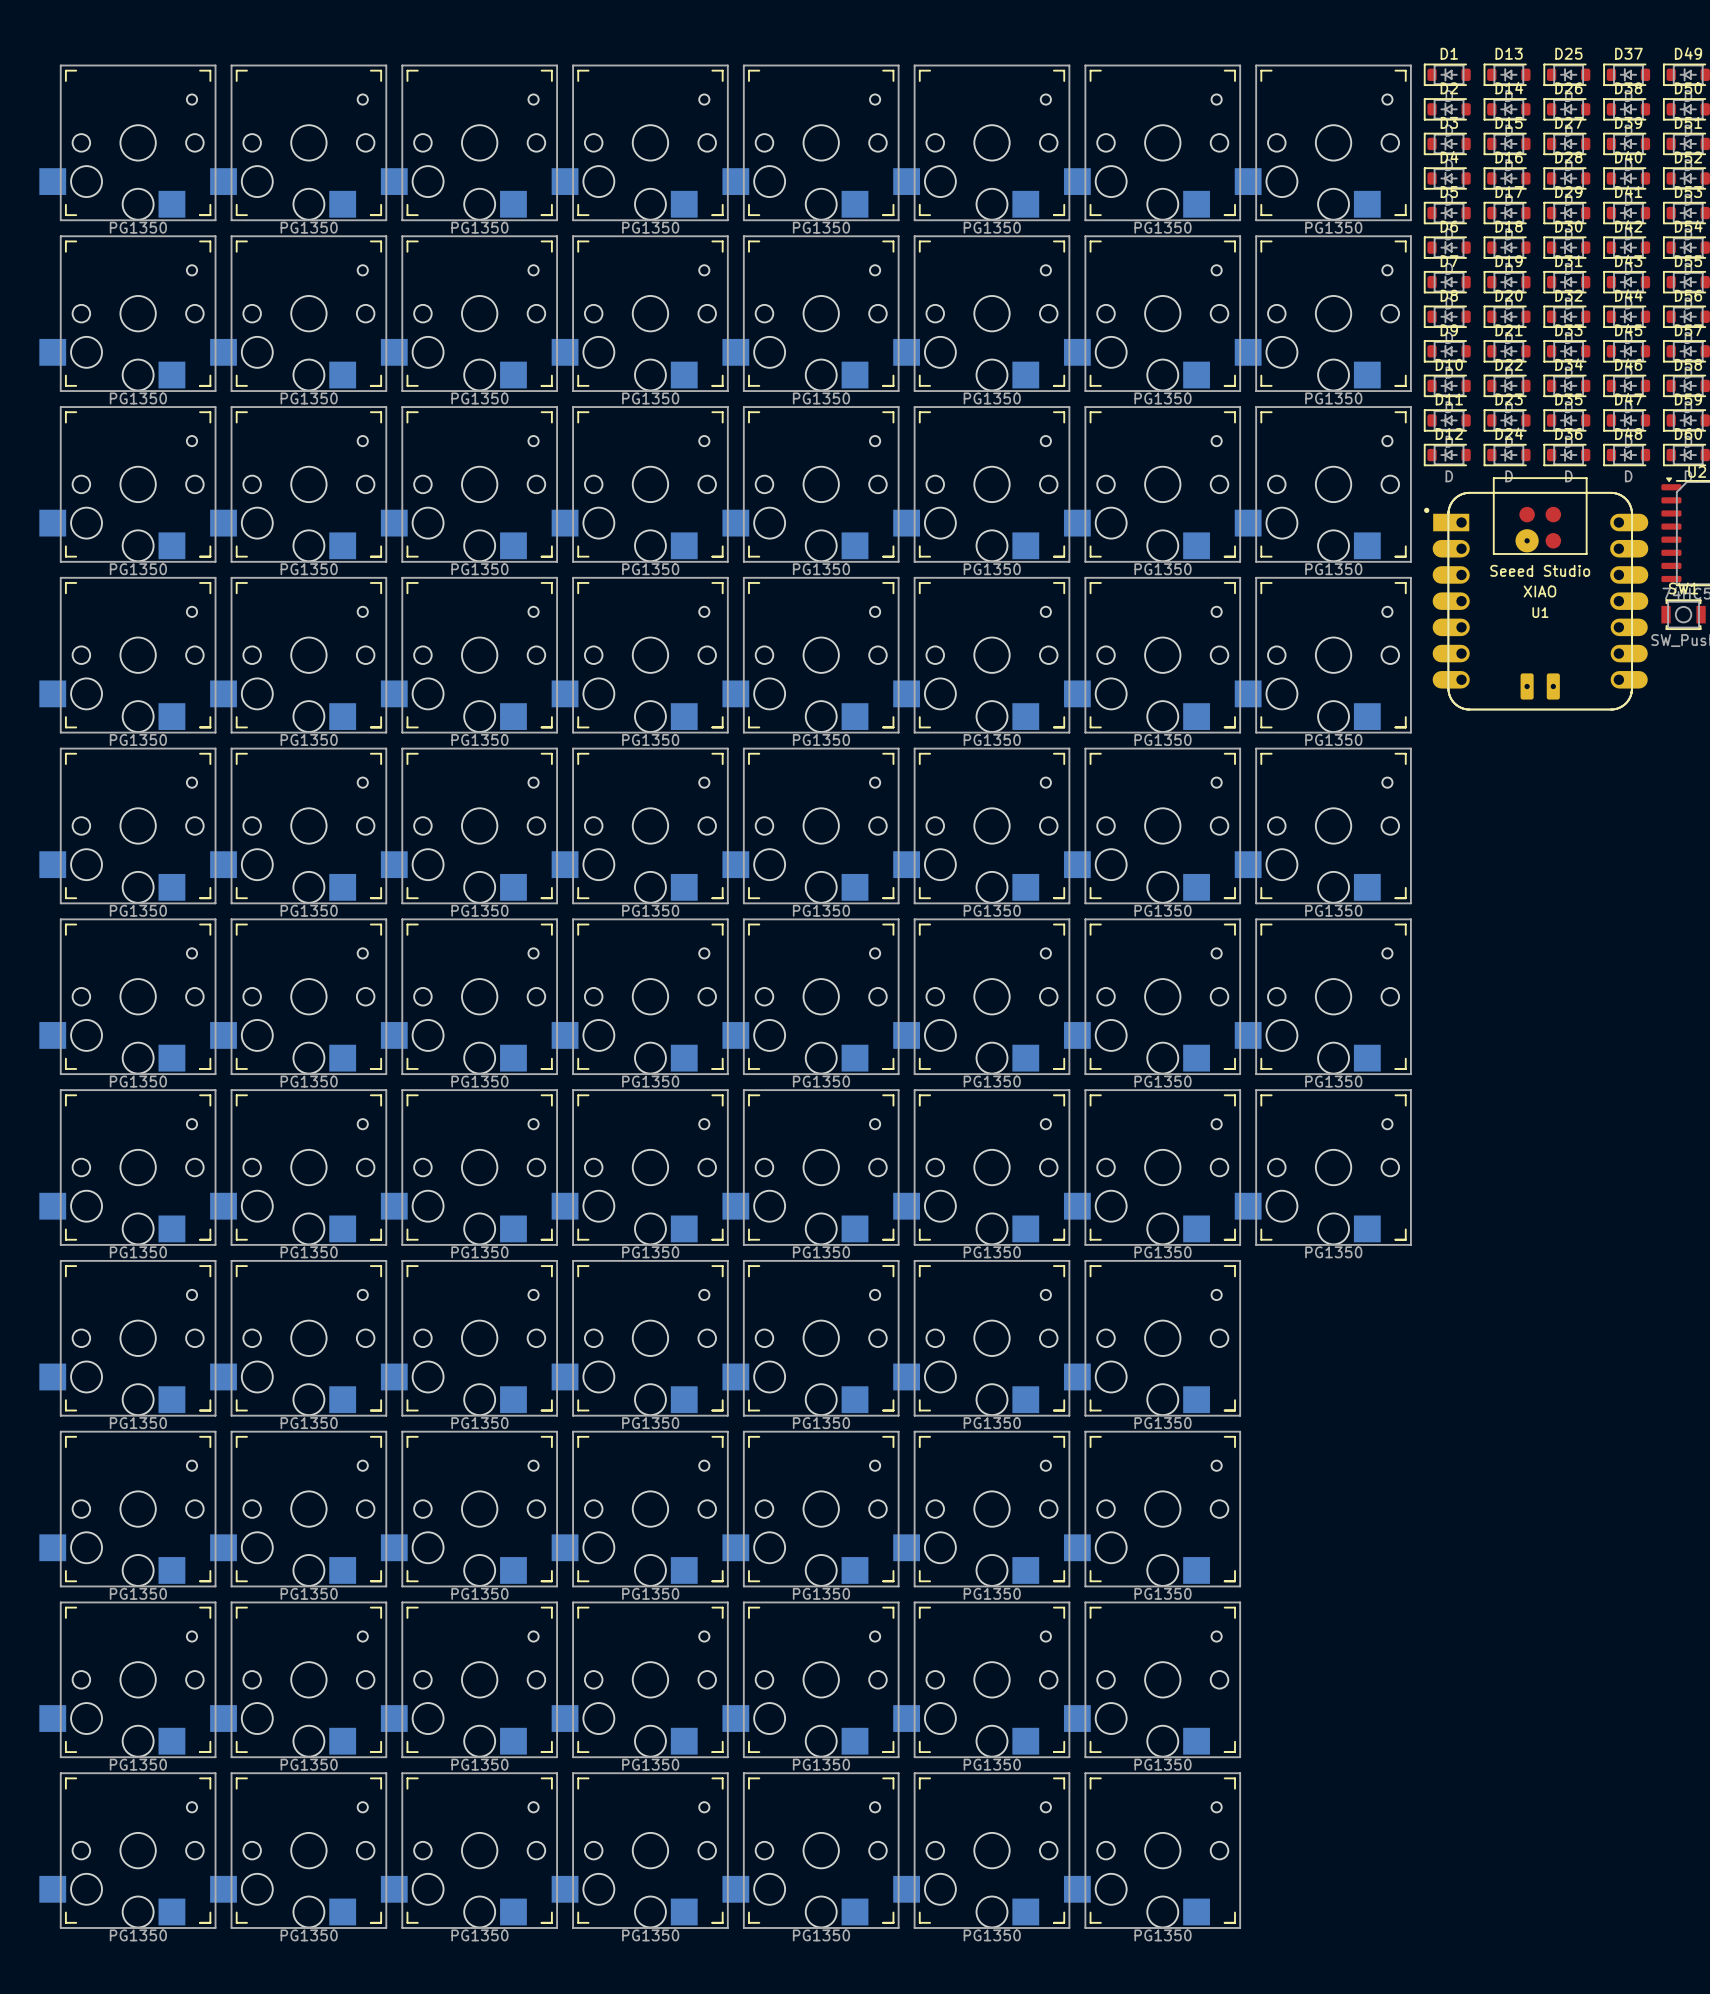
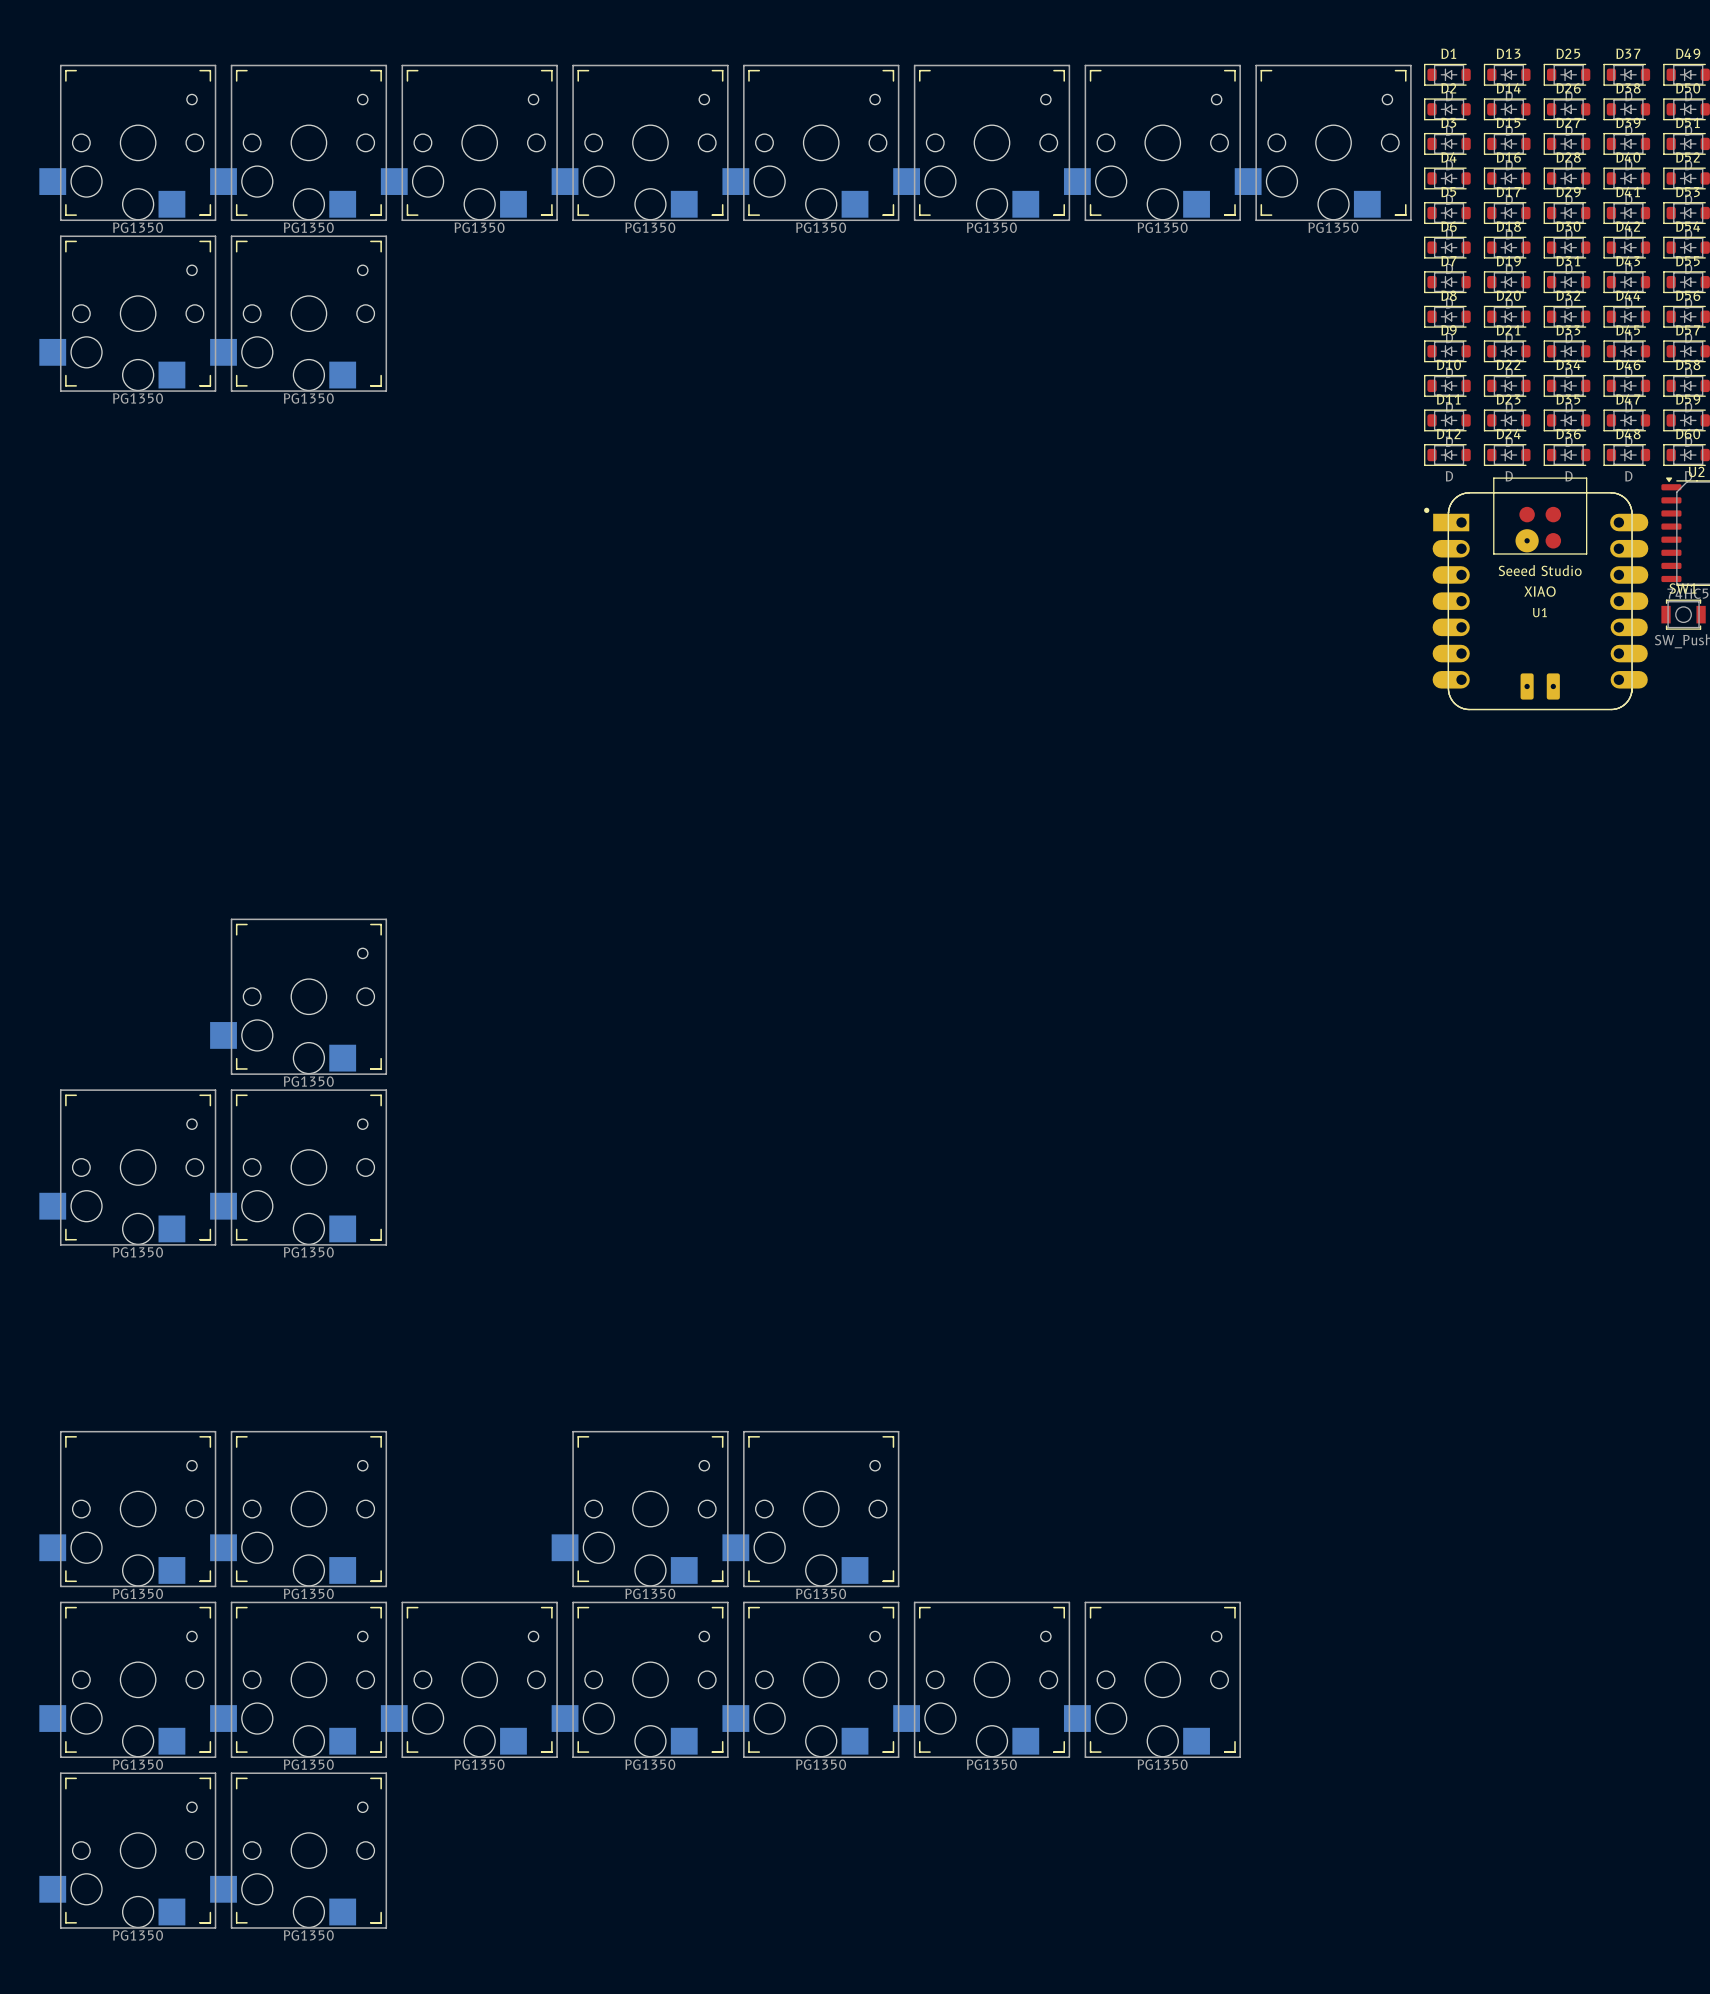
part: PG1350 (469, 313) -> none
part: PG1350 (640, 313) -> none
part: PG1350 (810, 313) -> none
part: PG1350 (981, 313) -> none
part: PG1350 (1152, 313) -> none
part: PG1350 (1323, 313) -> none
part: PG1350 (127, 484) -> none
part: PG1350 (298, 484) -> none
part: PG1350 (469, 484) -> none
part: PG1350 (640, 484) -> none
part: PG1350 (810, 484) -> none
part: PG1350 (981, 484) -> none
part: PG1350 (1152, 484) -> none
part: PG1350 (1323, 484) -> none
part: PG1350 (127, 655) -> none
part: PG1350 (298, 655) -> none
part: PG1350 (469, 655) -> none
part: PG1350 (640, 655) -> none
part: PG1350 (810, 655) -> none
part: PG1350 (981, 655) -> none
part: PG1350 (1152, 655) -> none
part: PG1350 (1323, 655) -> none
part: PG1350 (127, 825) -> none
part: PG1350 (298, 825) -> none
part: PG1350 (469, 825) -> none
part: PG1350 (640, 825) -> none
part: PG1350 (810, 825) -> none
part: PG1350 (981, 825) -> none
part: PG1350 (1152, 825) -> none
part: PG1350 (1323, 825) -> none
part: PG1350 (127, 996) -> none
part: PG1350 (469, 996) -> none
part: PG1350 (640, 996) -> none
part: PG1350 (810, 996) -> none
part: PG1350 (981, 996) -> none
part: PG1350 (1152, 996) -> none
part: PG1350 (1323, 996) -> none
part: PG1350 (469, 1167) -> none
part: PG1350 (640, 1167) -> none
part: PG1350 (810, 1167) -> none
part: PG1350 (981, 1167) -> none
part: PG1350 (1152, 1167) -> none
part: PG1350 (1323, 1167) -> none
part: PG1350 (127, 1338) -> none
part: PG1350 (298, 1338) -> none
part: PG1350 (469, 1338) -> none
part: PG1350 (640, 1338) -> none
part: PG1350 (810, 1338) -> none
part: PG1350 (981, 1338) -> none
part: PG1350 (1152, 1338) -> none
part: PG1350 (469, 1509) -> none
part: PG1350 (981, 1509) -> none
part: PG1350 (1152, 1509) -> none
part: PG1350 (469, 1850) -> none
part: PG1350 (640, 1850) -> none
part: PG1350 (810, 1850) -> none
part: PG1350 (981, 1850) -> none
part: PG1350 (1152, 1850) -> none

